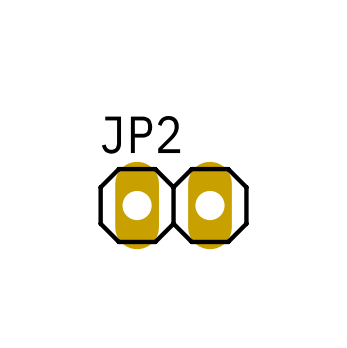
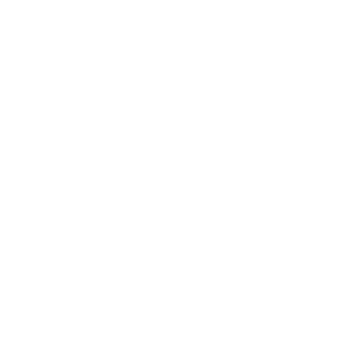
JP2: (173, 205) -> none

